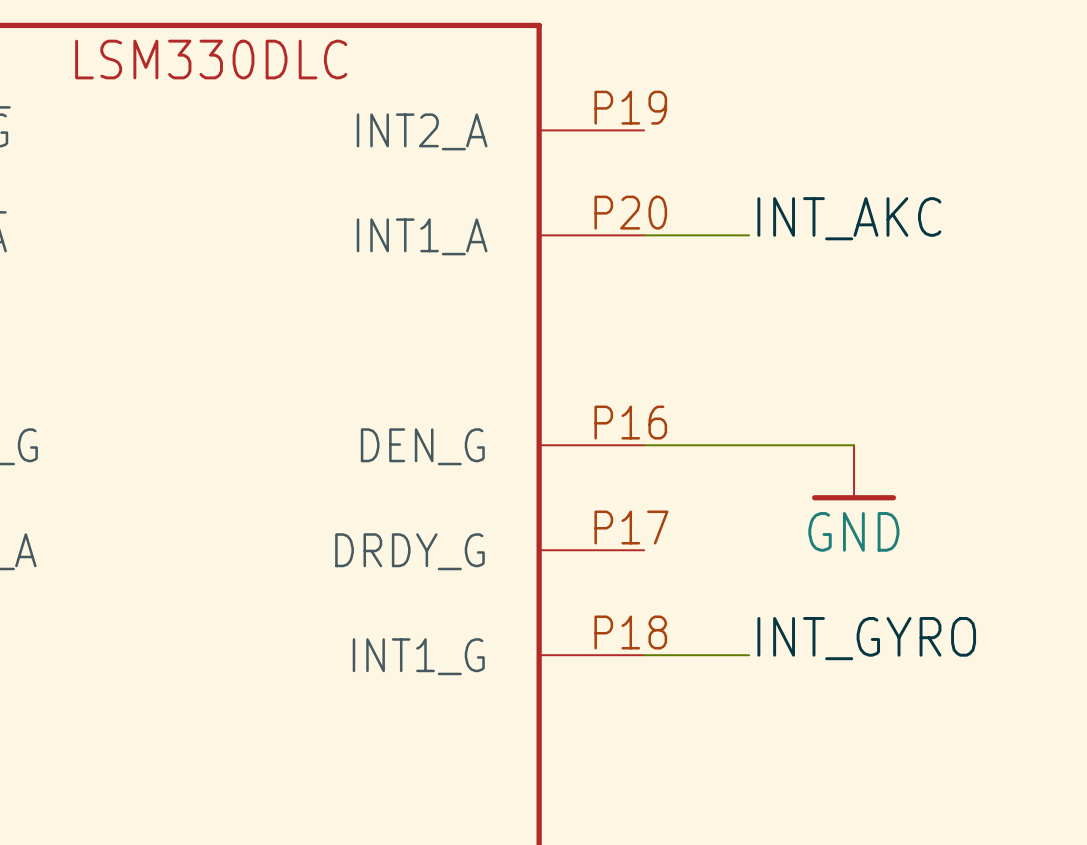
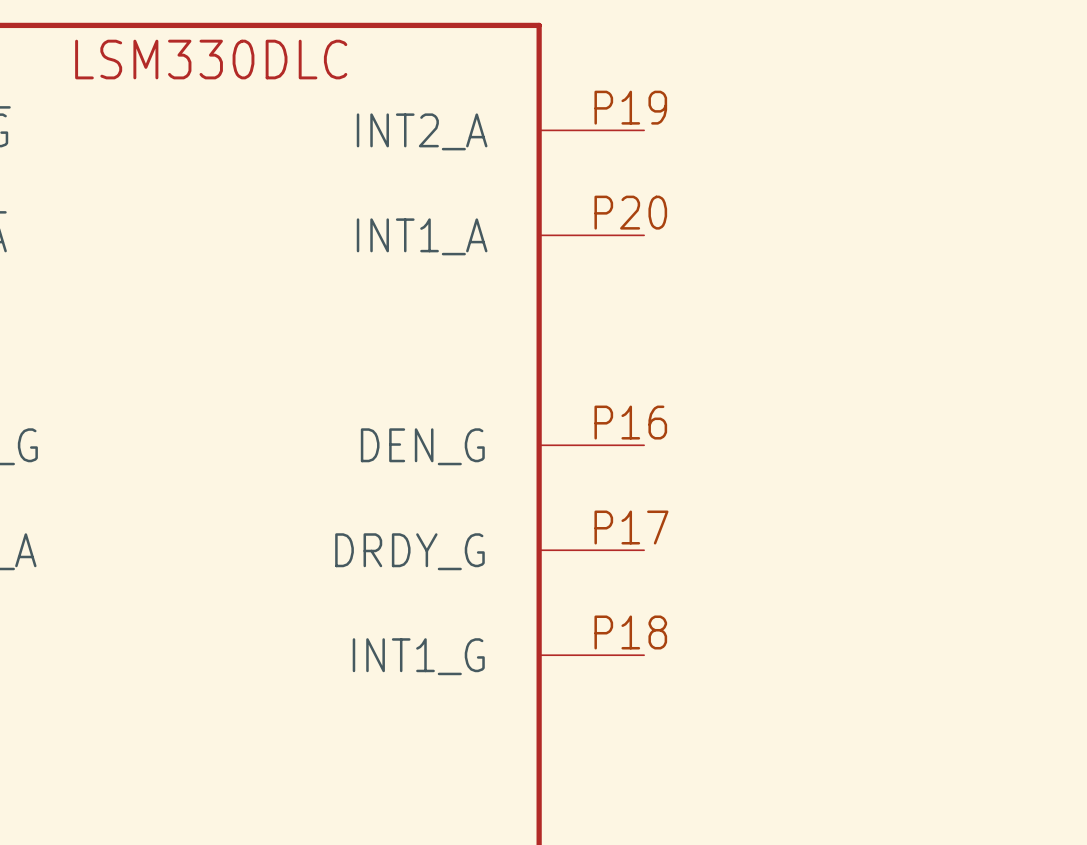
label: INT_AKC (849, 218) -> none
wire: (644, 235) (749, 235) -> none
wire: (644, 445) (854, 445) -> none
power symbol: GND (854, 472) -> none
label: INT_GYRO (866, 638) -> none
wire: (644, 655) (749, 655) -> none

